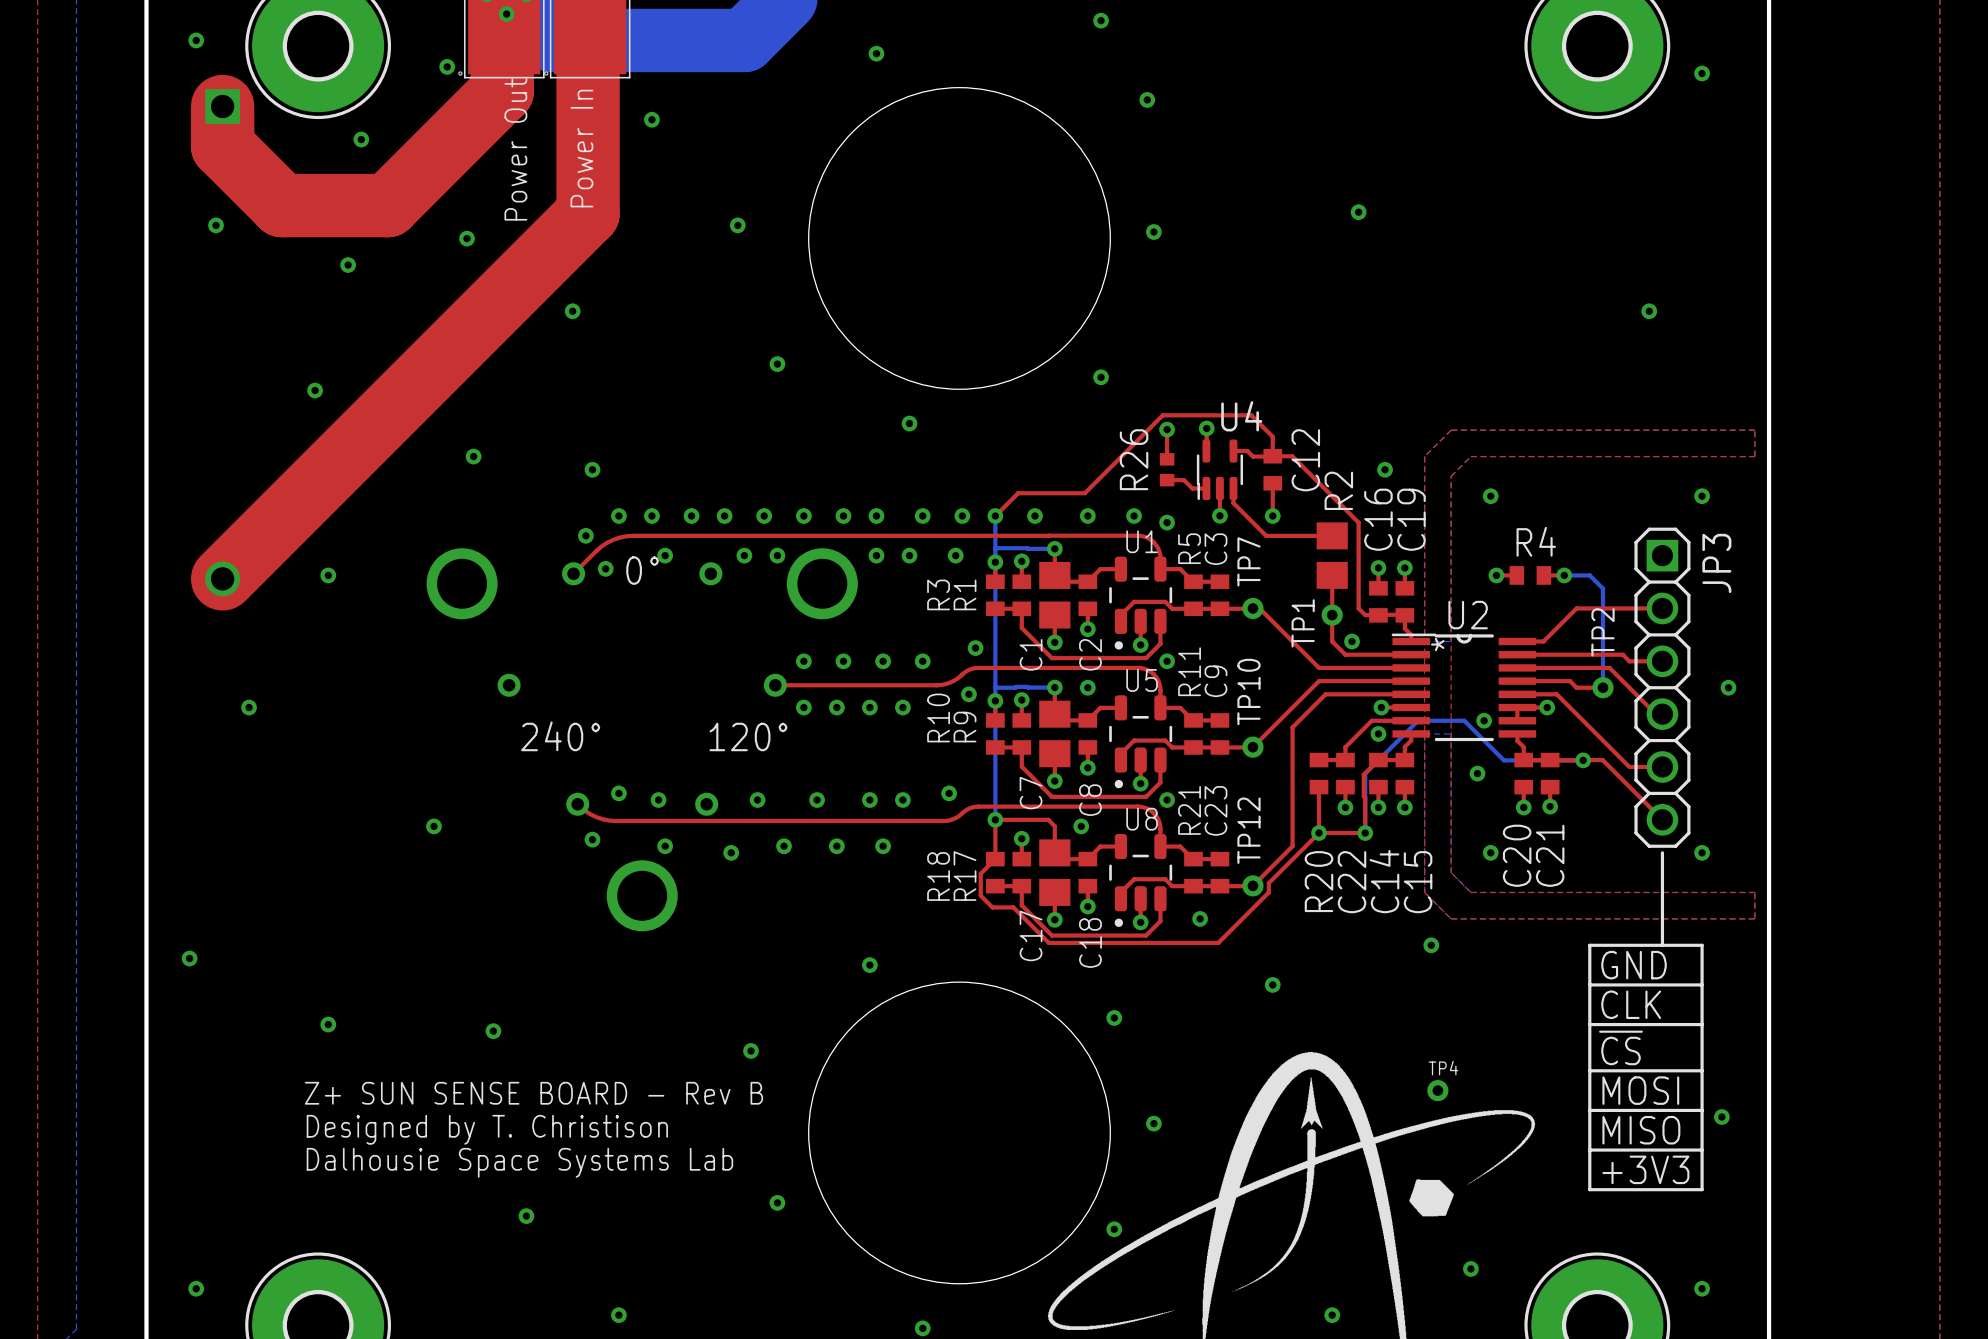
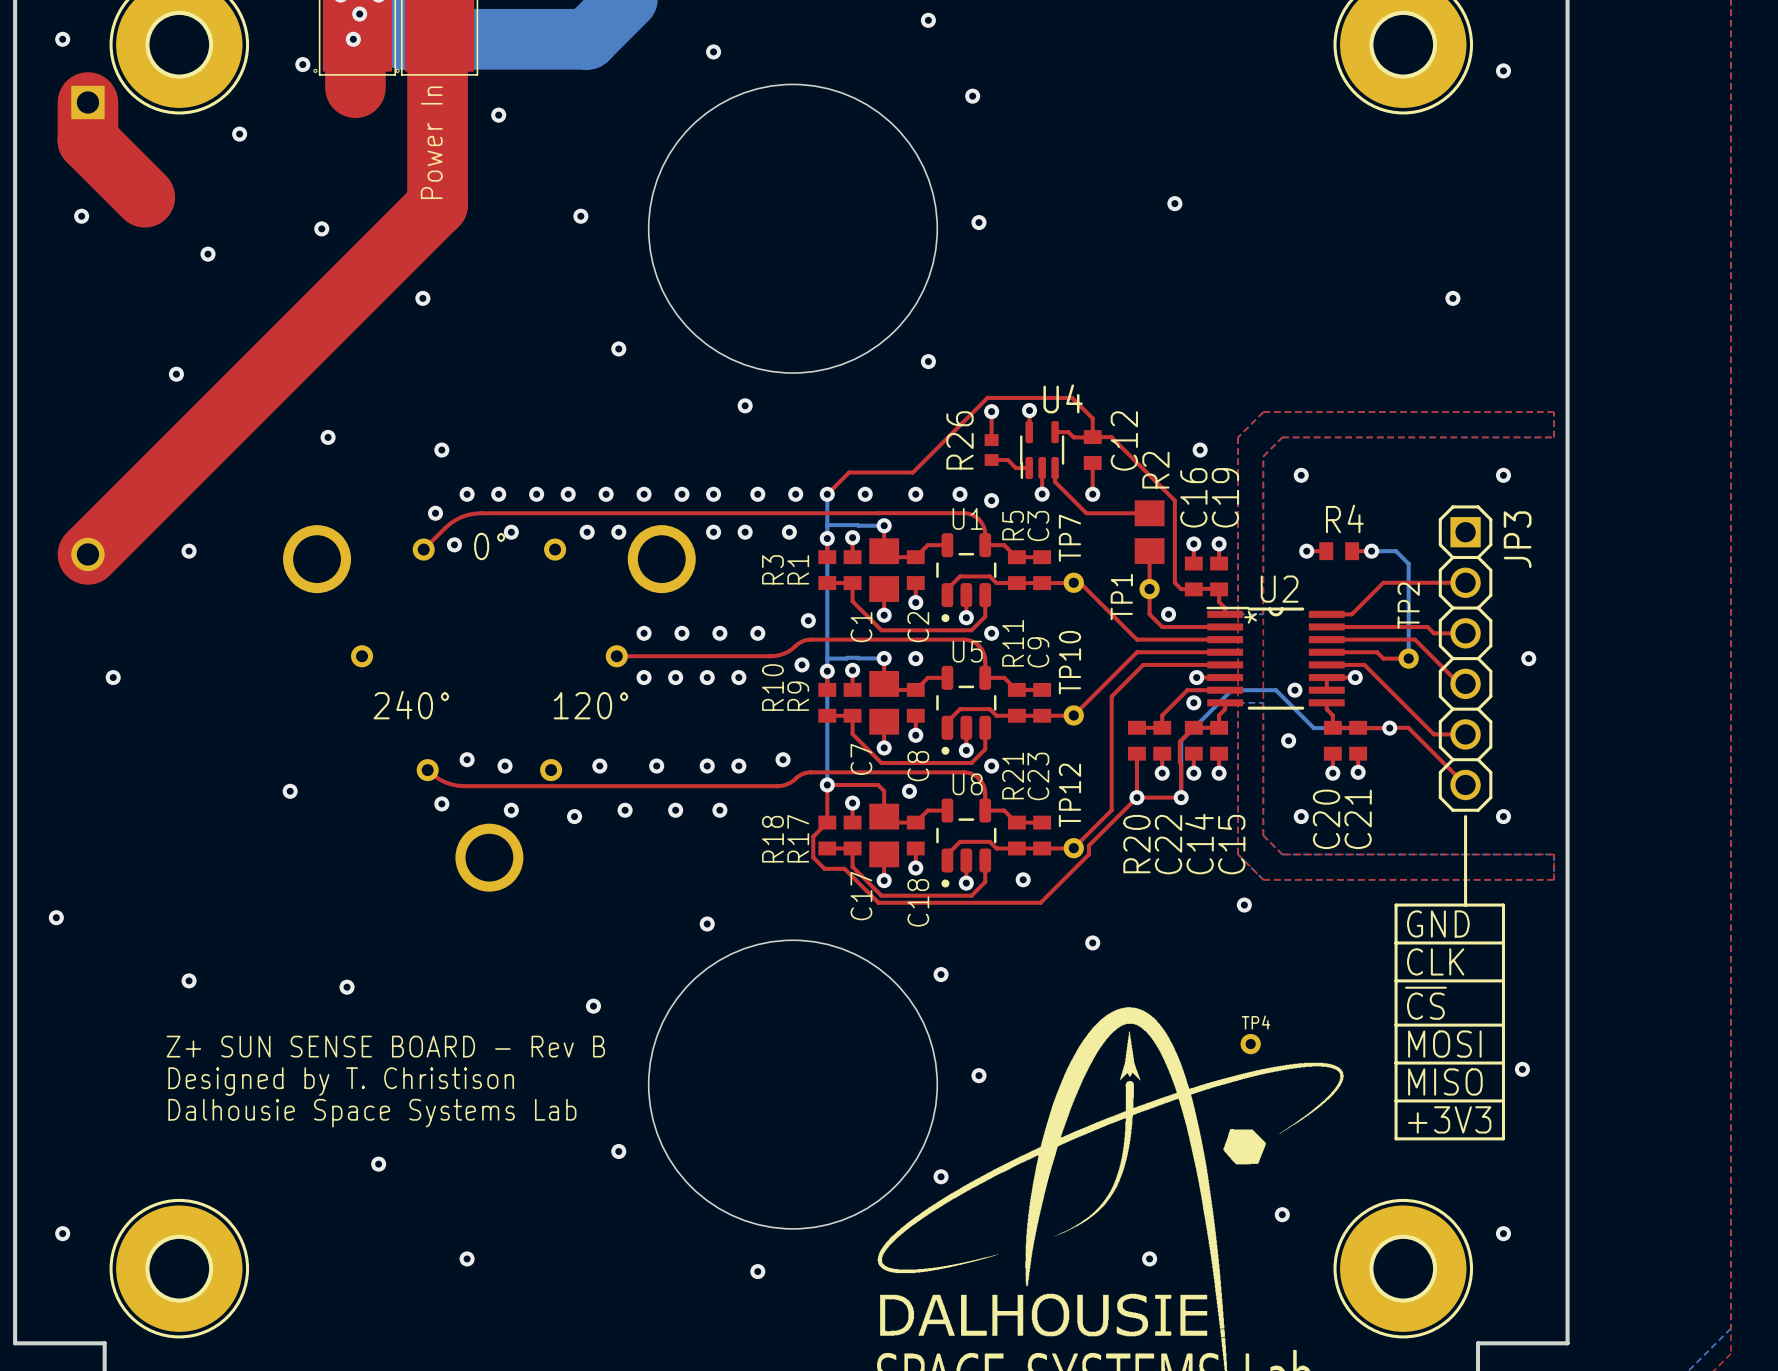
via: none -> (353, 39)
top track: (502, 91) (387, 205) (282, 205) (295, 218) -> none
via position: (361, 139) -> (239, 134)
text: Power Out (515, 149) -> none

